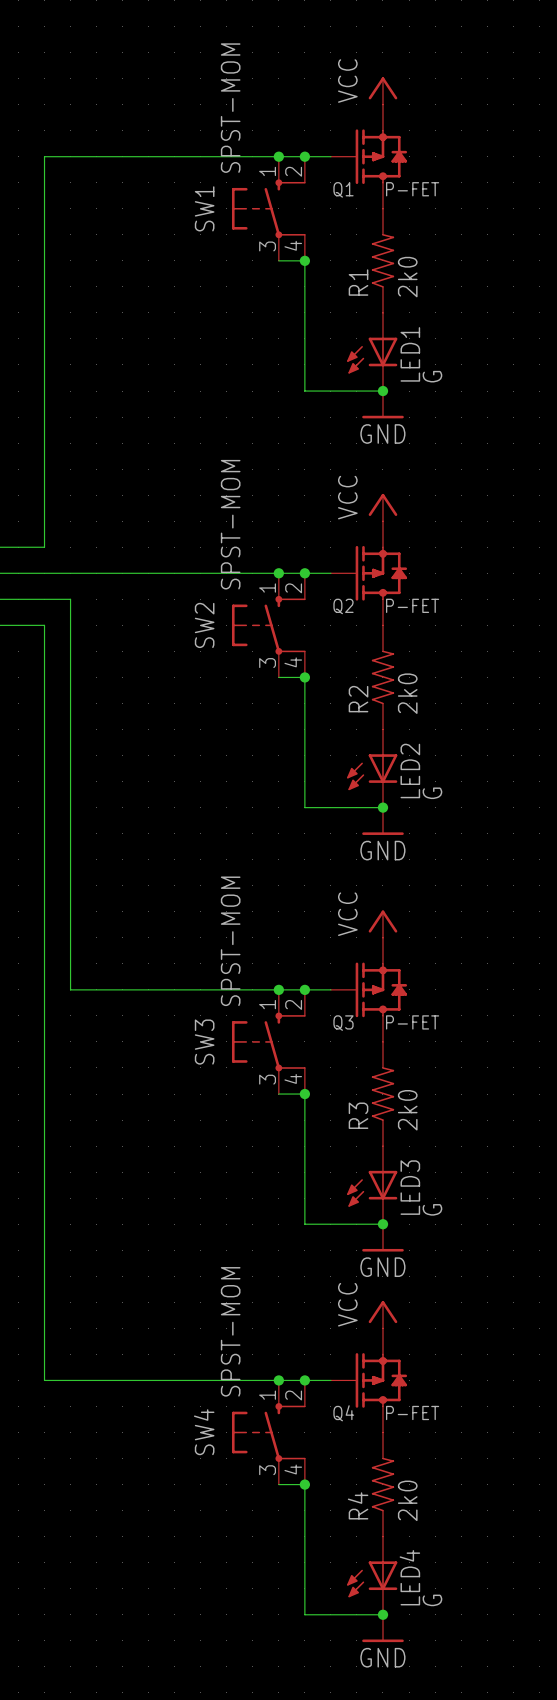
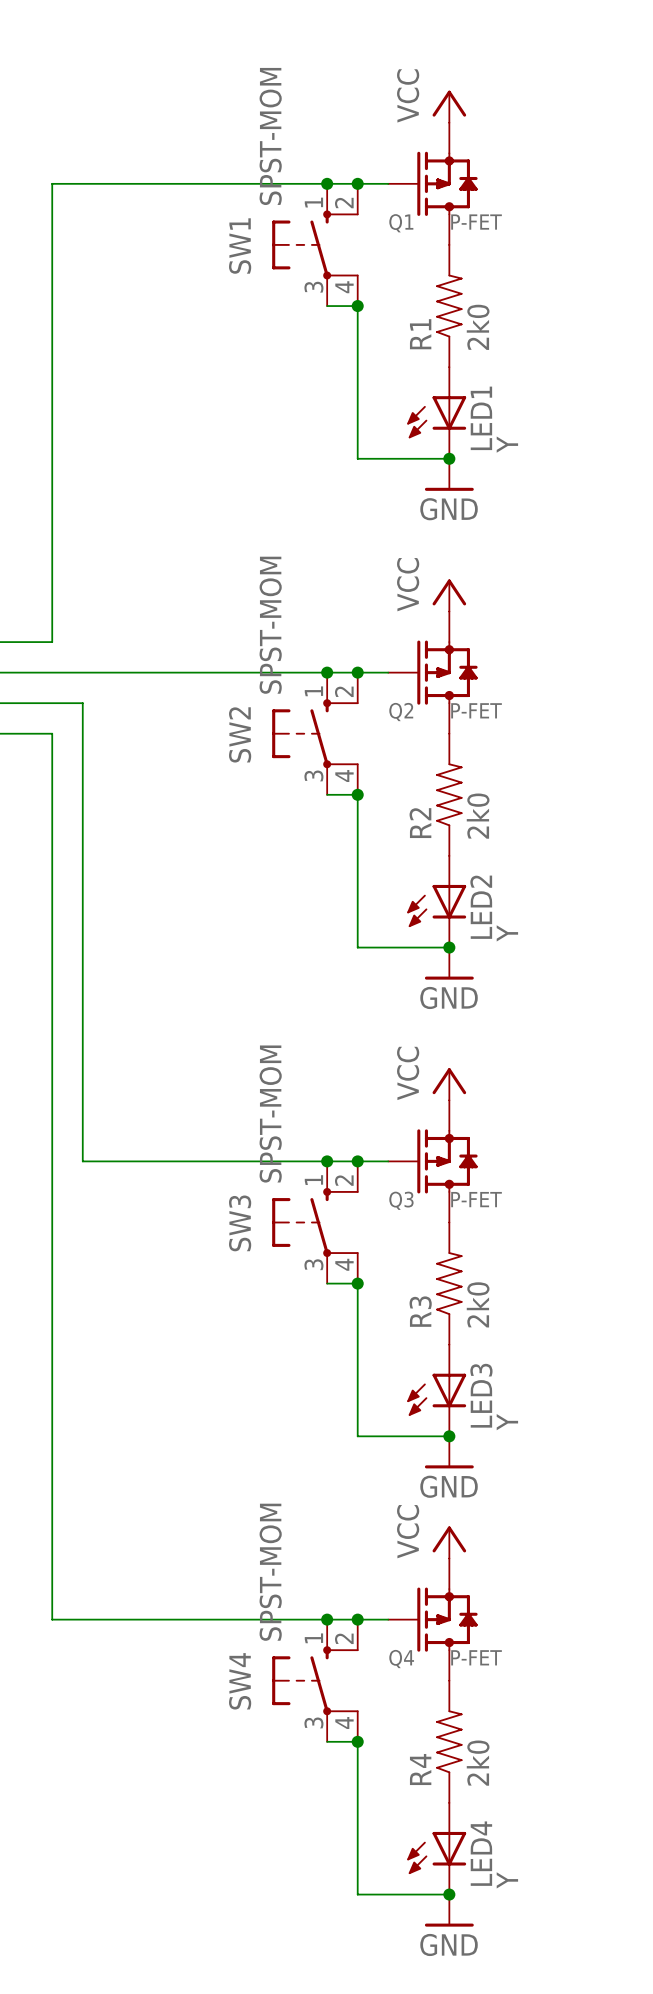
LED1 value: G (432, 376) -> Y (507, 444)
LED2 value: G (432, 793) -> Y (507, 933)
LED3 value: G (432, 1209) -> Y (507, 1422)
LED4 value: G (432, 1600) -> Y (507, 1880)

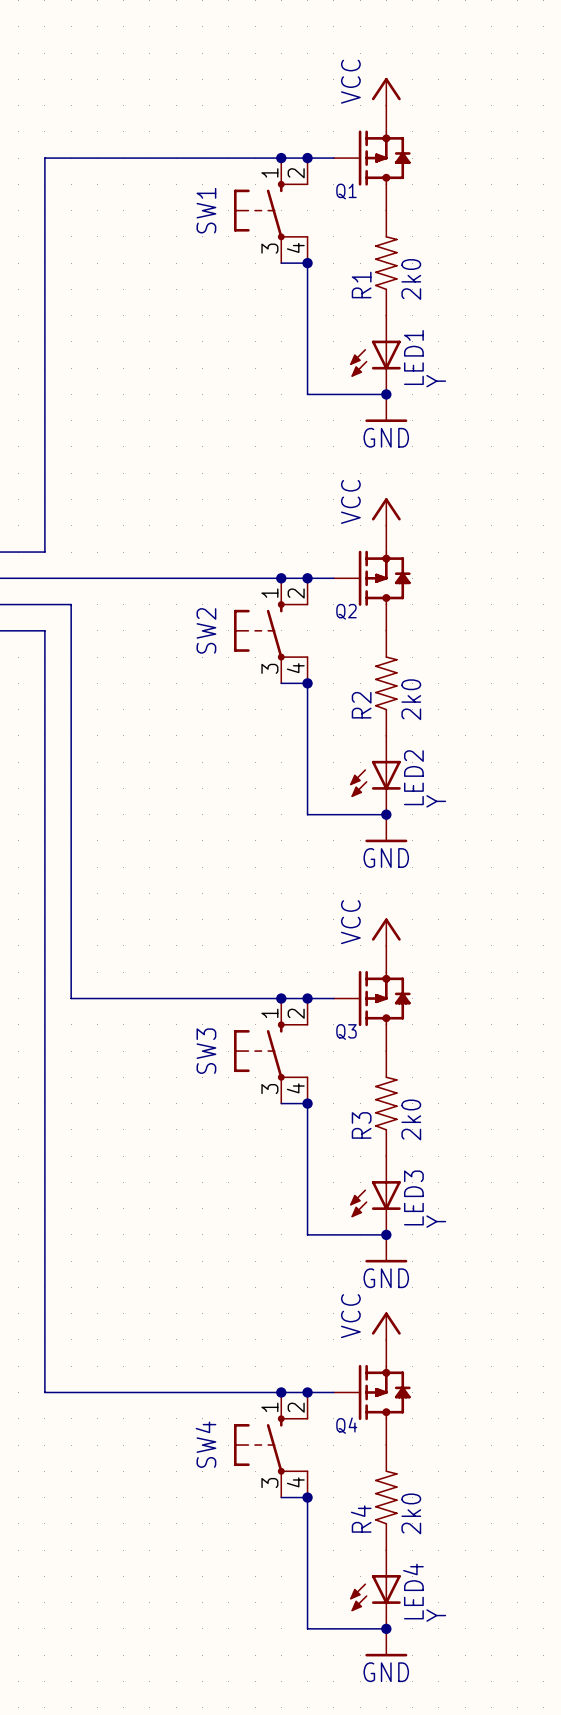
SW1 value: SPST-MOM (270, 136) -> none
Q1 value: P-FET (476, 222) -> none
SW2 value: SPST-MOM (270, 625) -> none
Q2 value: P-FET (476, 710) -> none
SW3 value: SPST-MOM (270, 1114) -> none
Q3 value: P-FET (476, 1199) -> none
SW4 value: SPST-MOM (270, 1572) -> none
Q4 value: P-FET (476, 1657) -> none

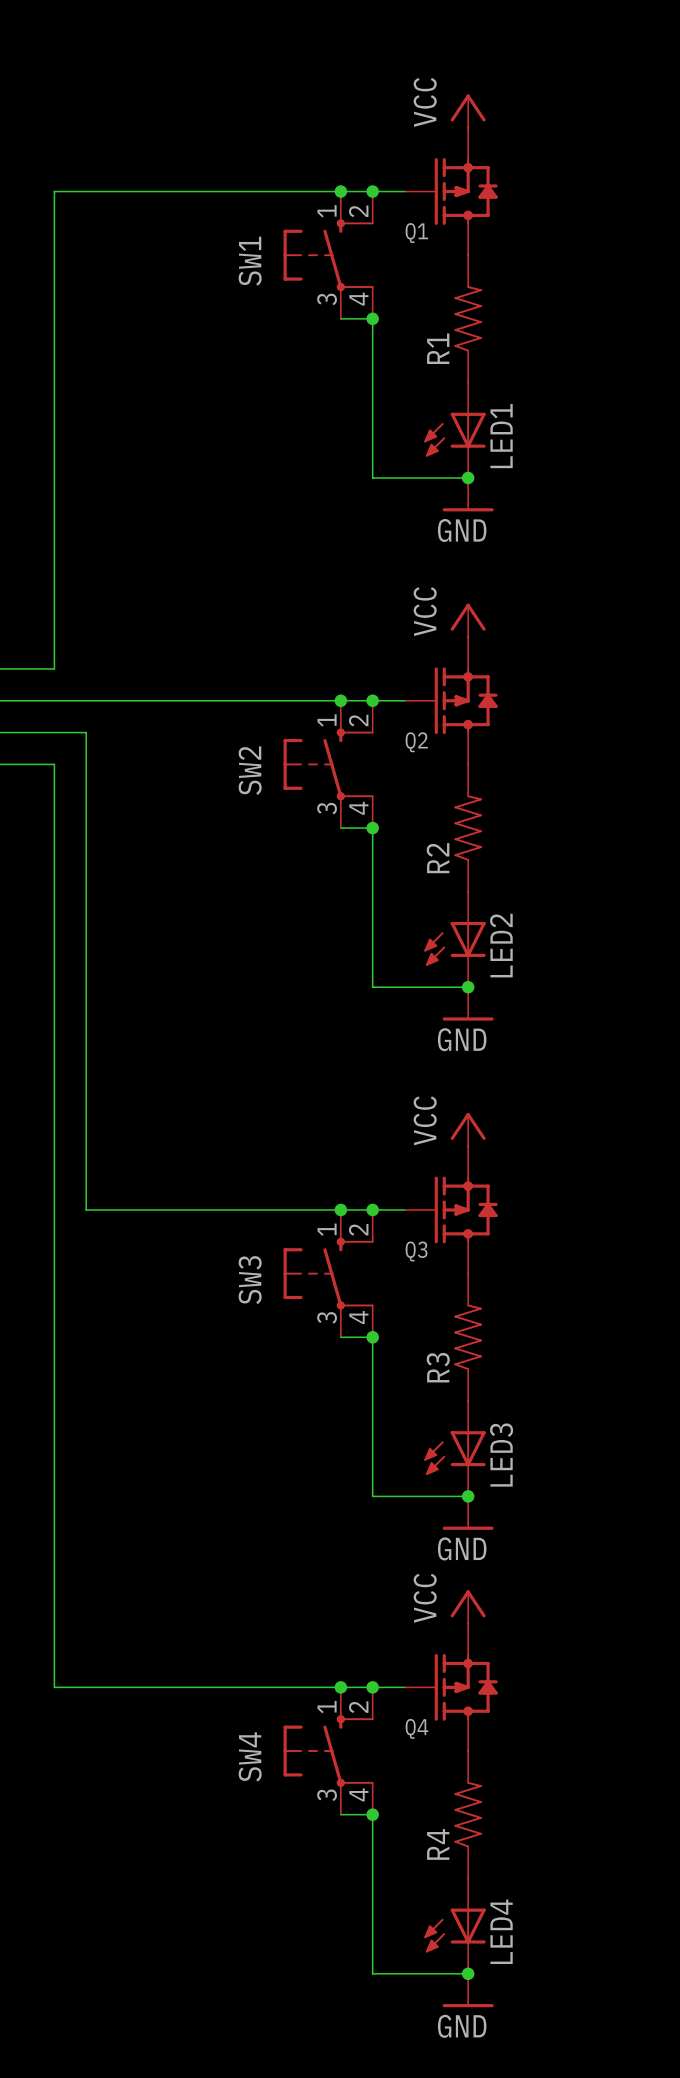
R1 value: 2k0 (411, 279) -> none
LED1 value: Y (436, 381) -> none
R2 value: 2k0 (411, 699) -> none
LED2 value: Y (436, 801) -> none
R3 value: 2k0 (411, 1119) -> none
LED3 value: Y (436, 1221) -> none
R4 value: 2k0 (411, 1513) -> none
LED4 value: Y (436, 1615) -> none

